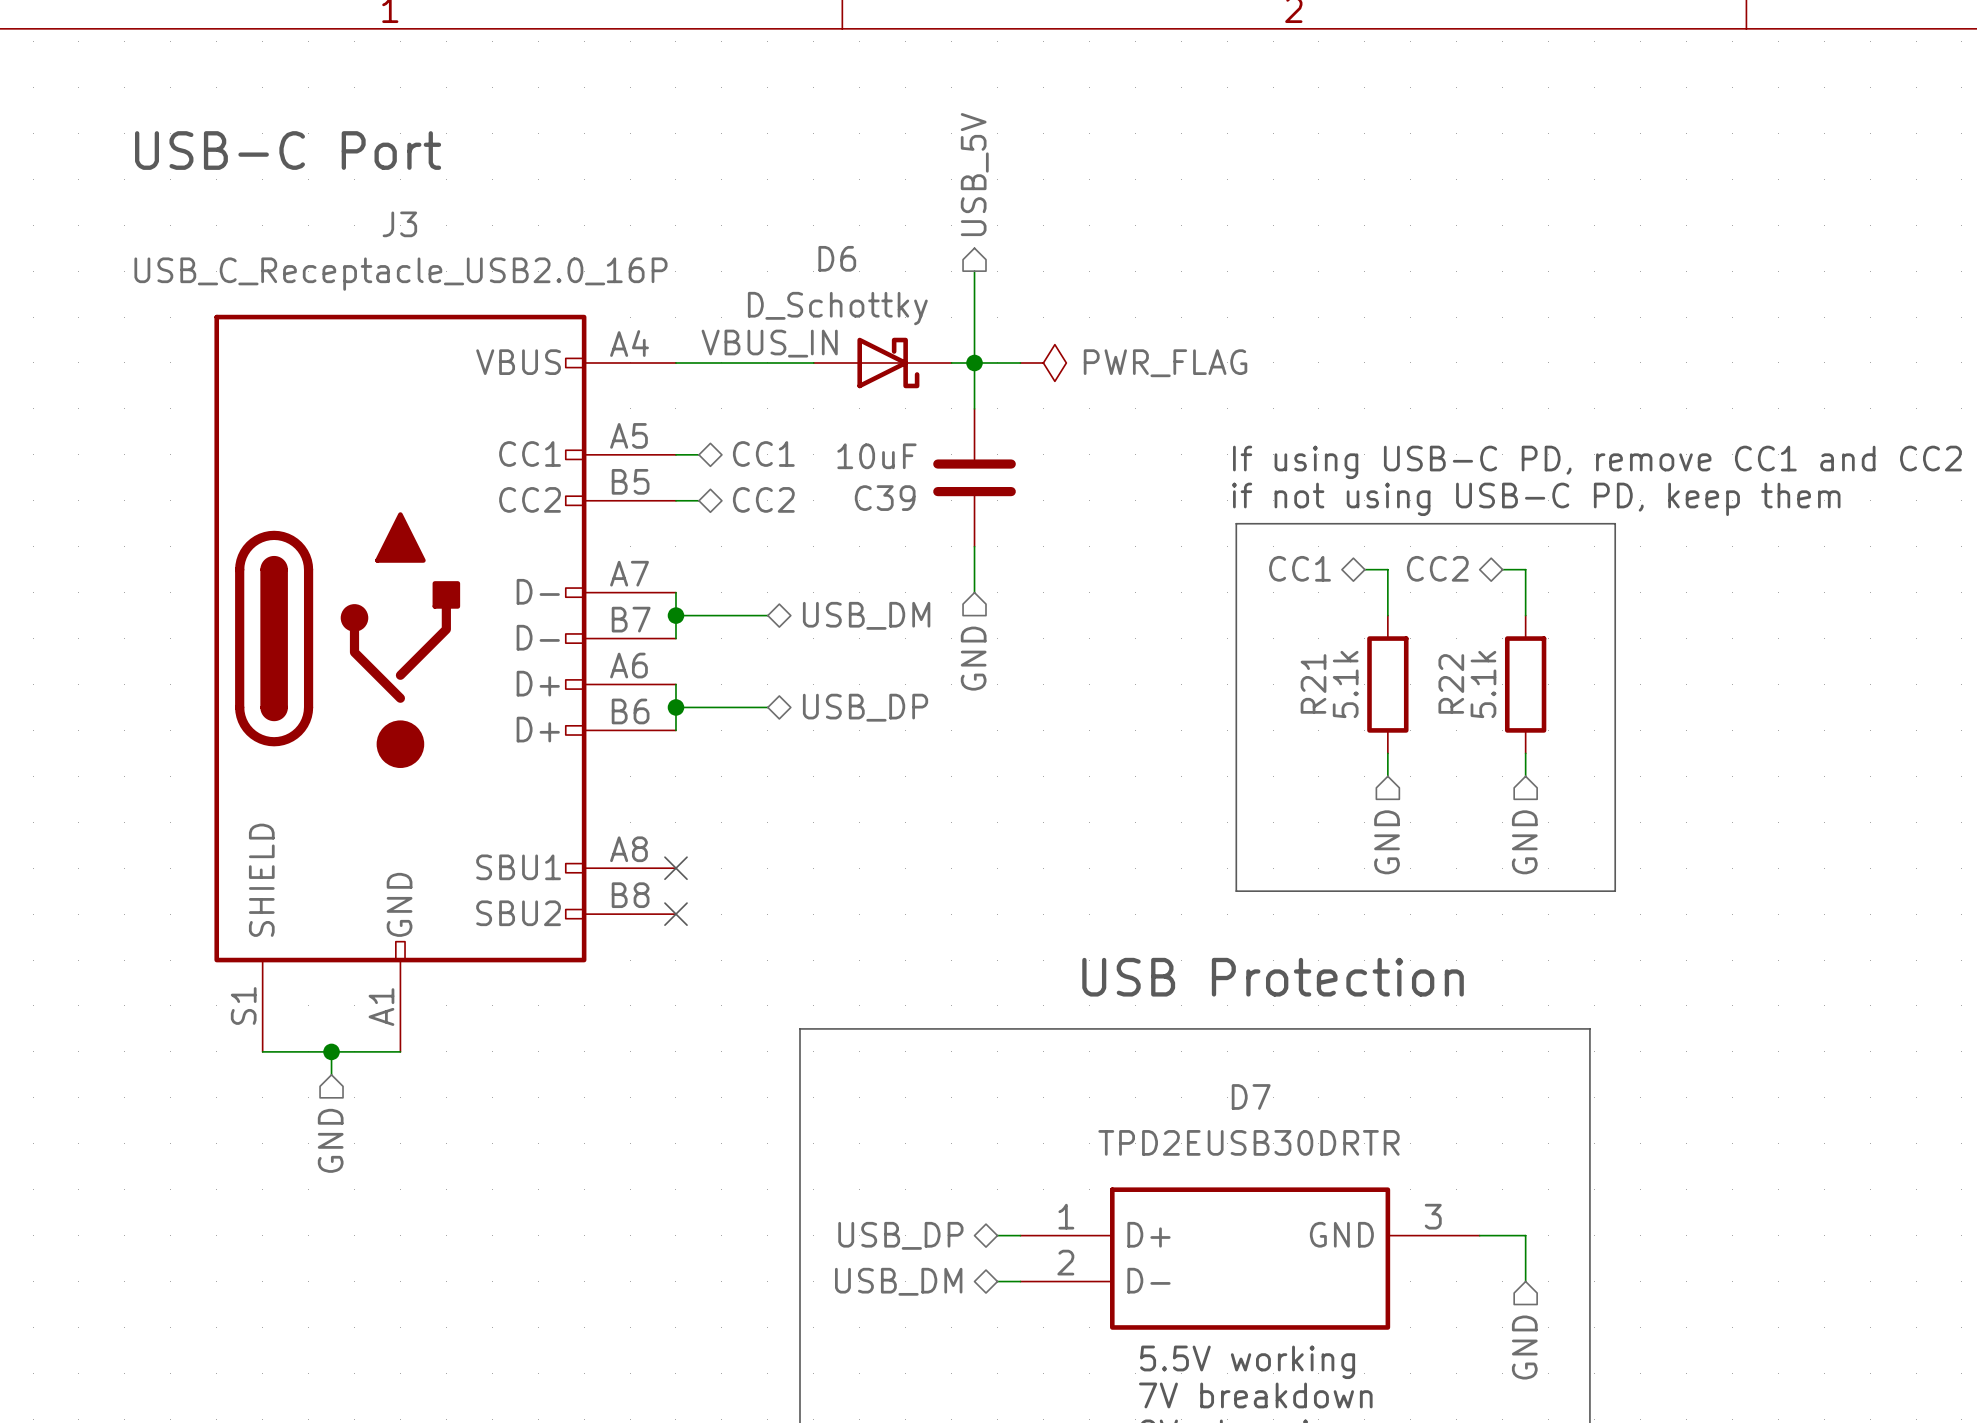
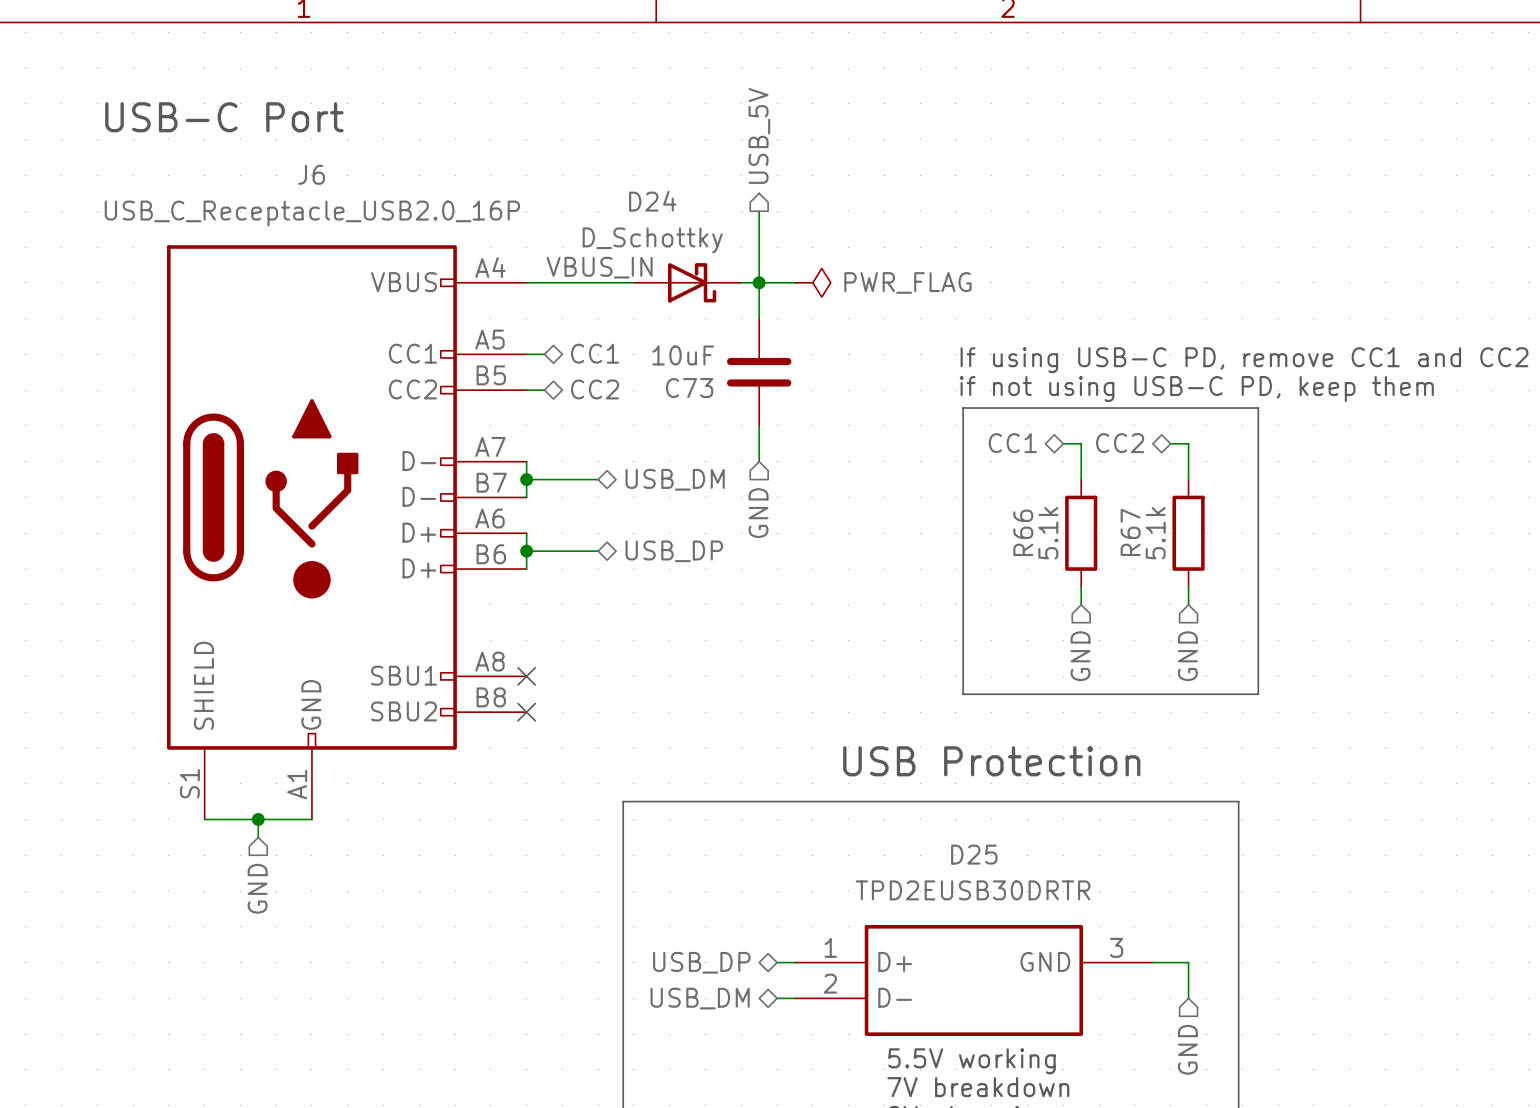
J3 name: J3 (399, 224) -> J6 (311, 174)
D6 name: D6 (837, 258) -> D24 (652, 201)
C39 name: C39 (885, 498) -> C73 (689, 388)
R21 name: R21 (1313, 683) -> R66 (1023, 532)
R22 name: R22 (1451, 683) -> R67 (1130, 532)
D7 name: D7 (1251, 1096) -> D25 (974, 854)

